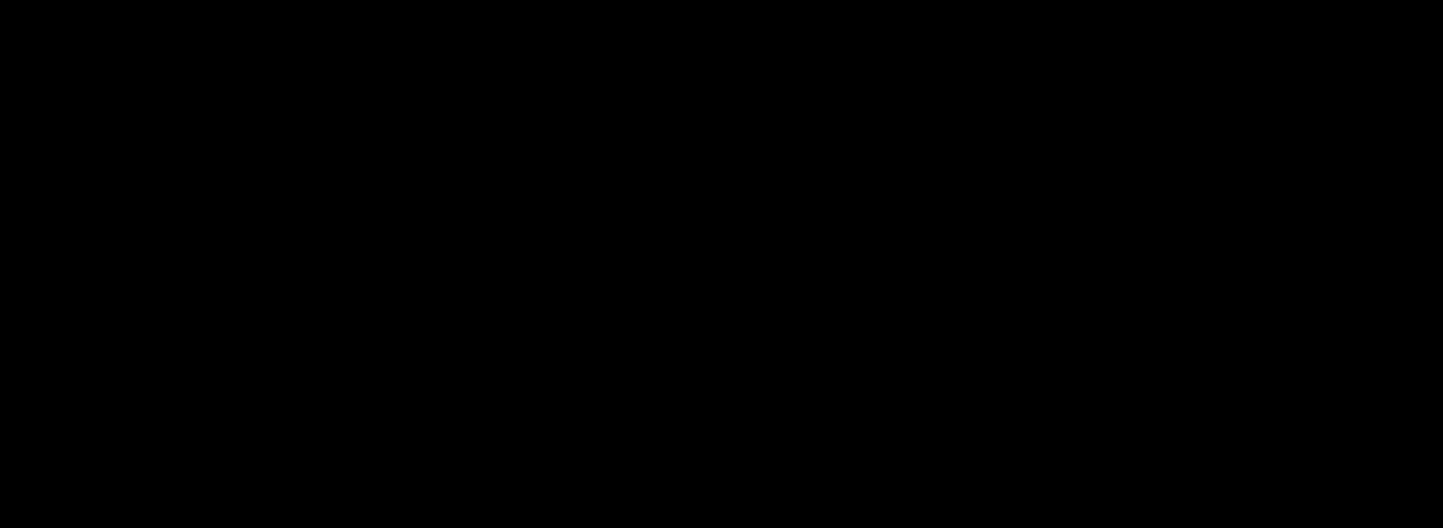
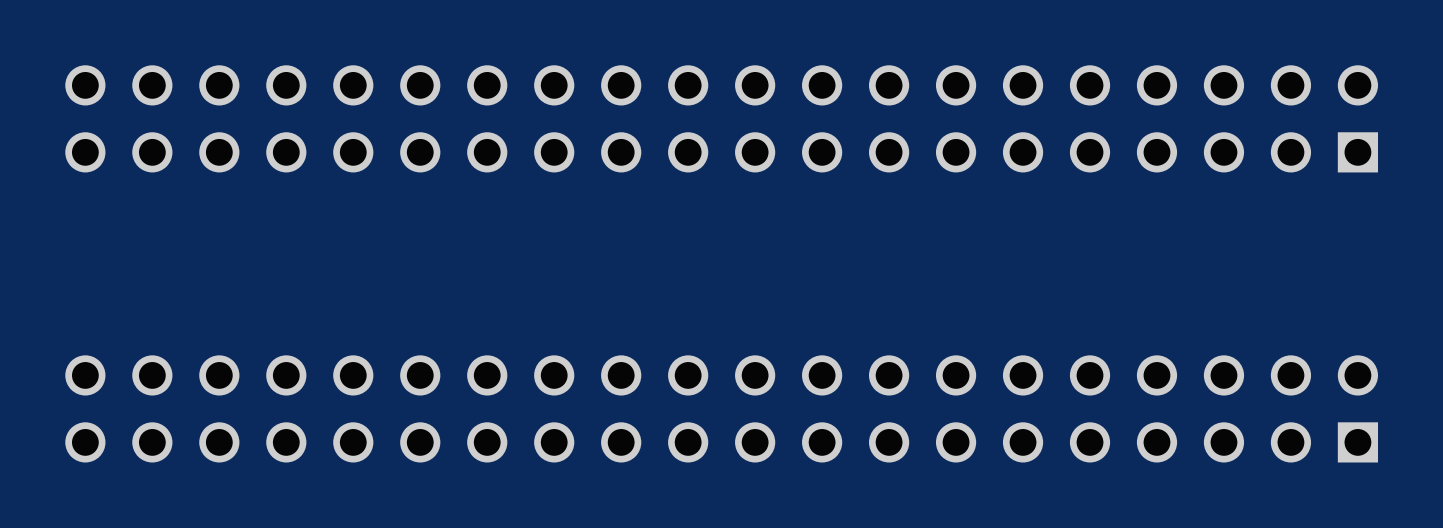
part: none -> (721, 118)
part: none -> (721, 408)

